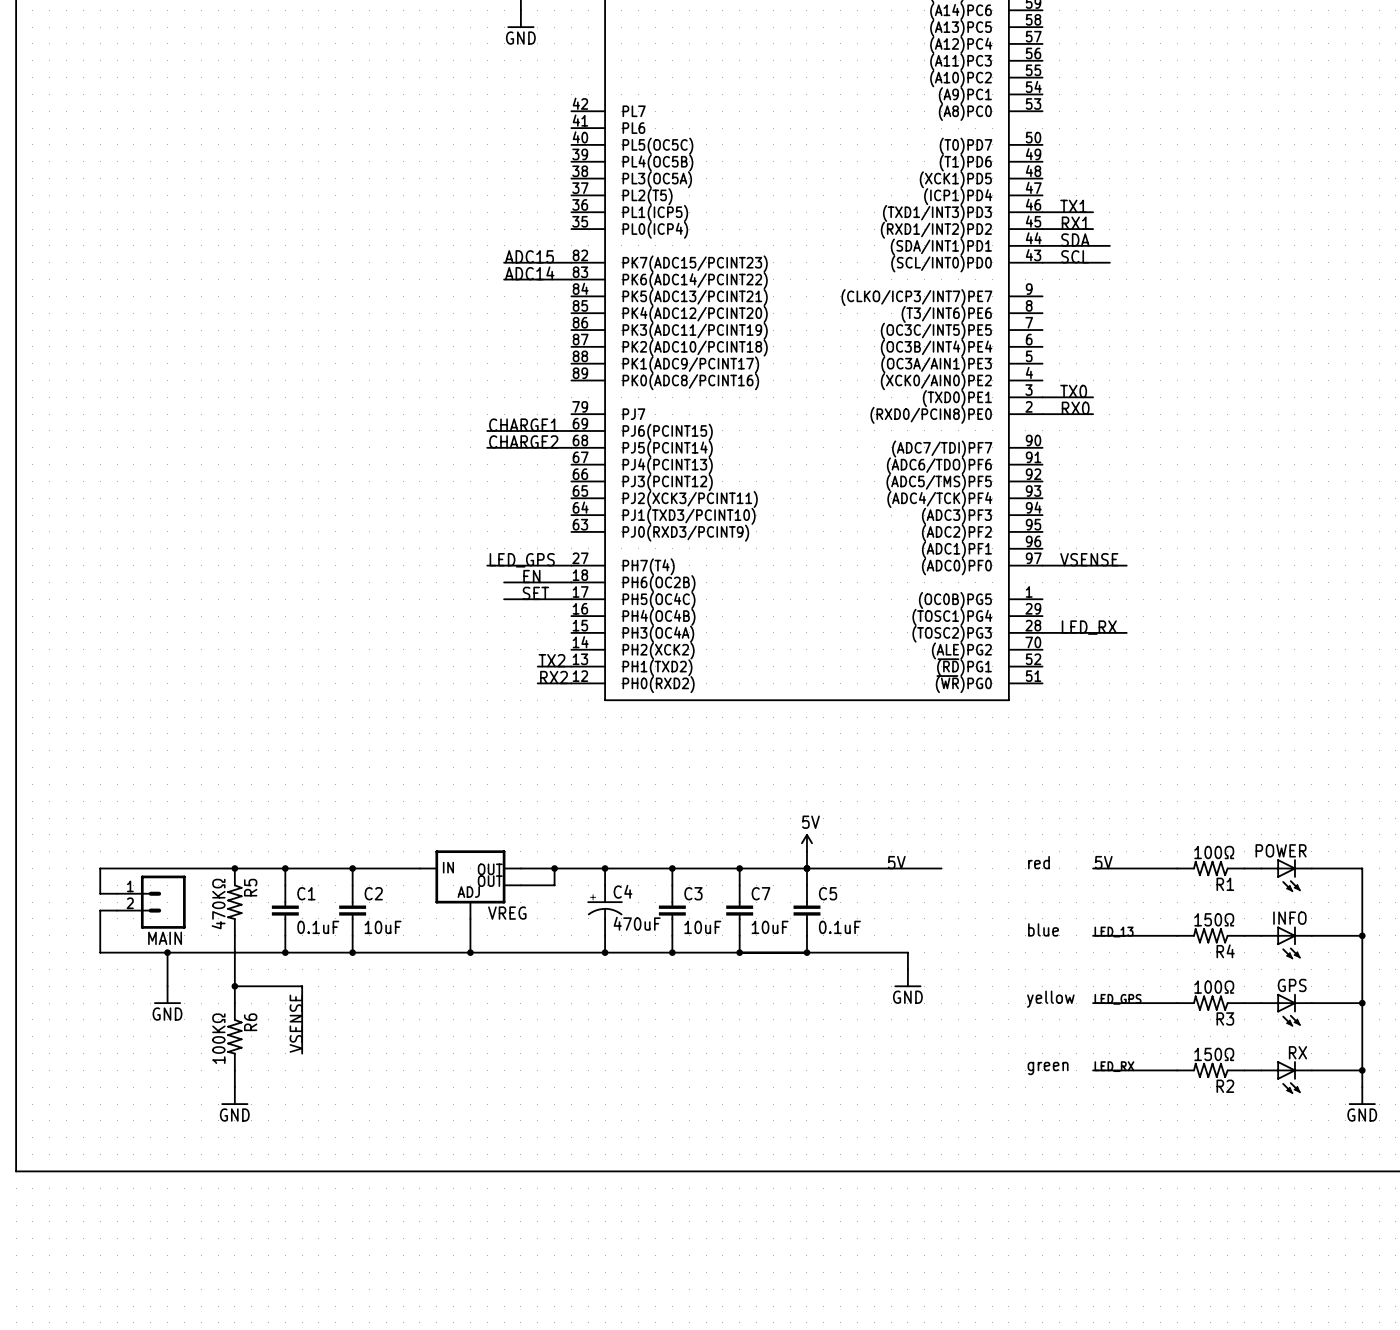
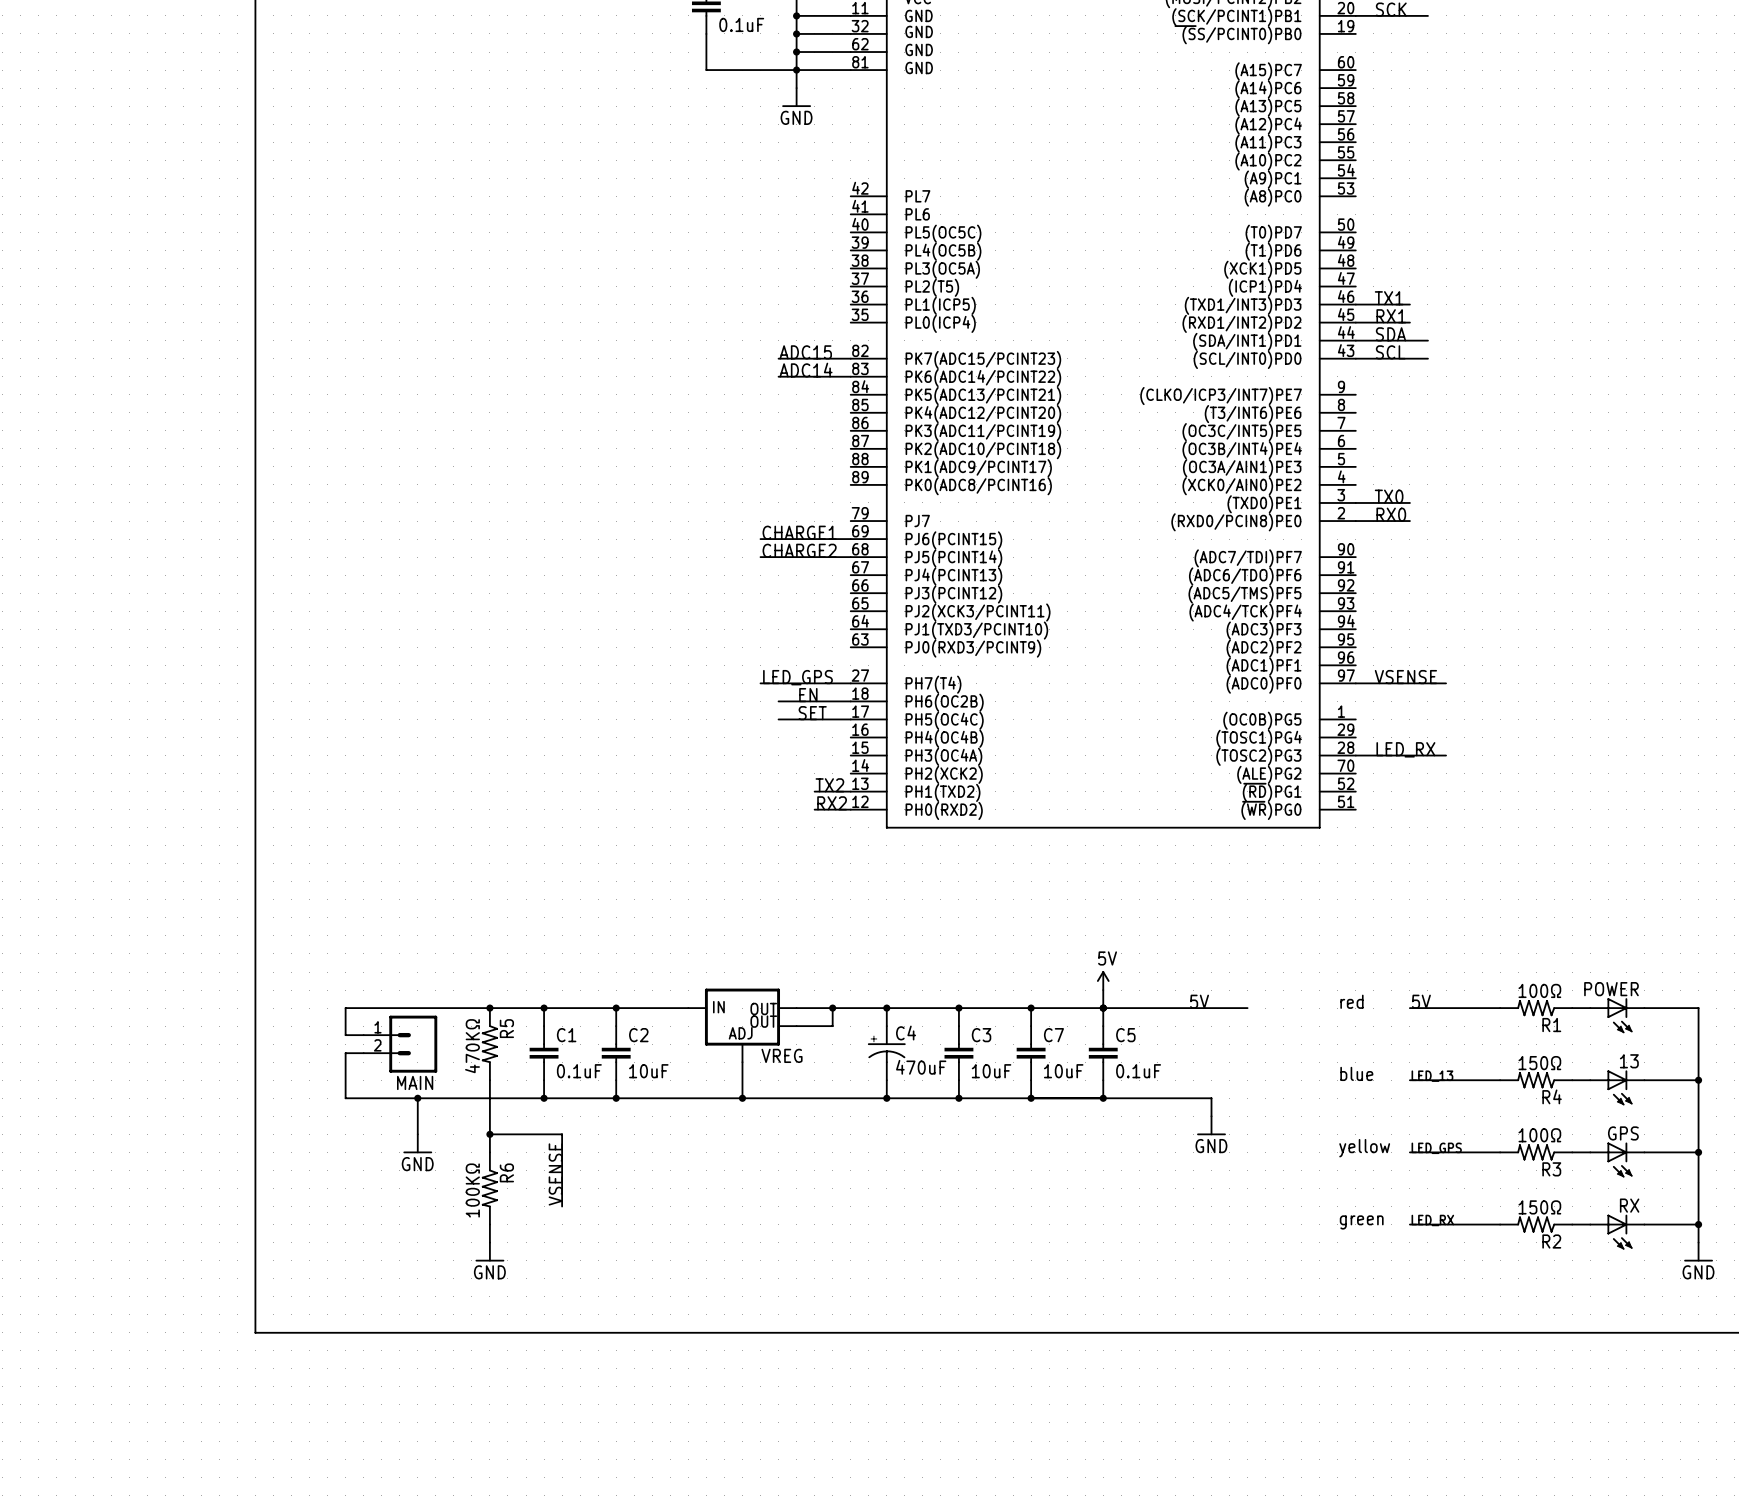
INFO name: INFO (1289, 918) -> 13 (1629, 1061)

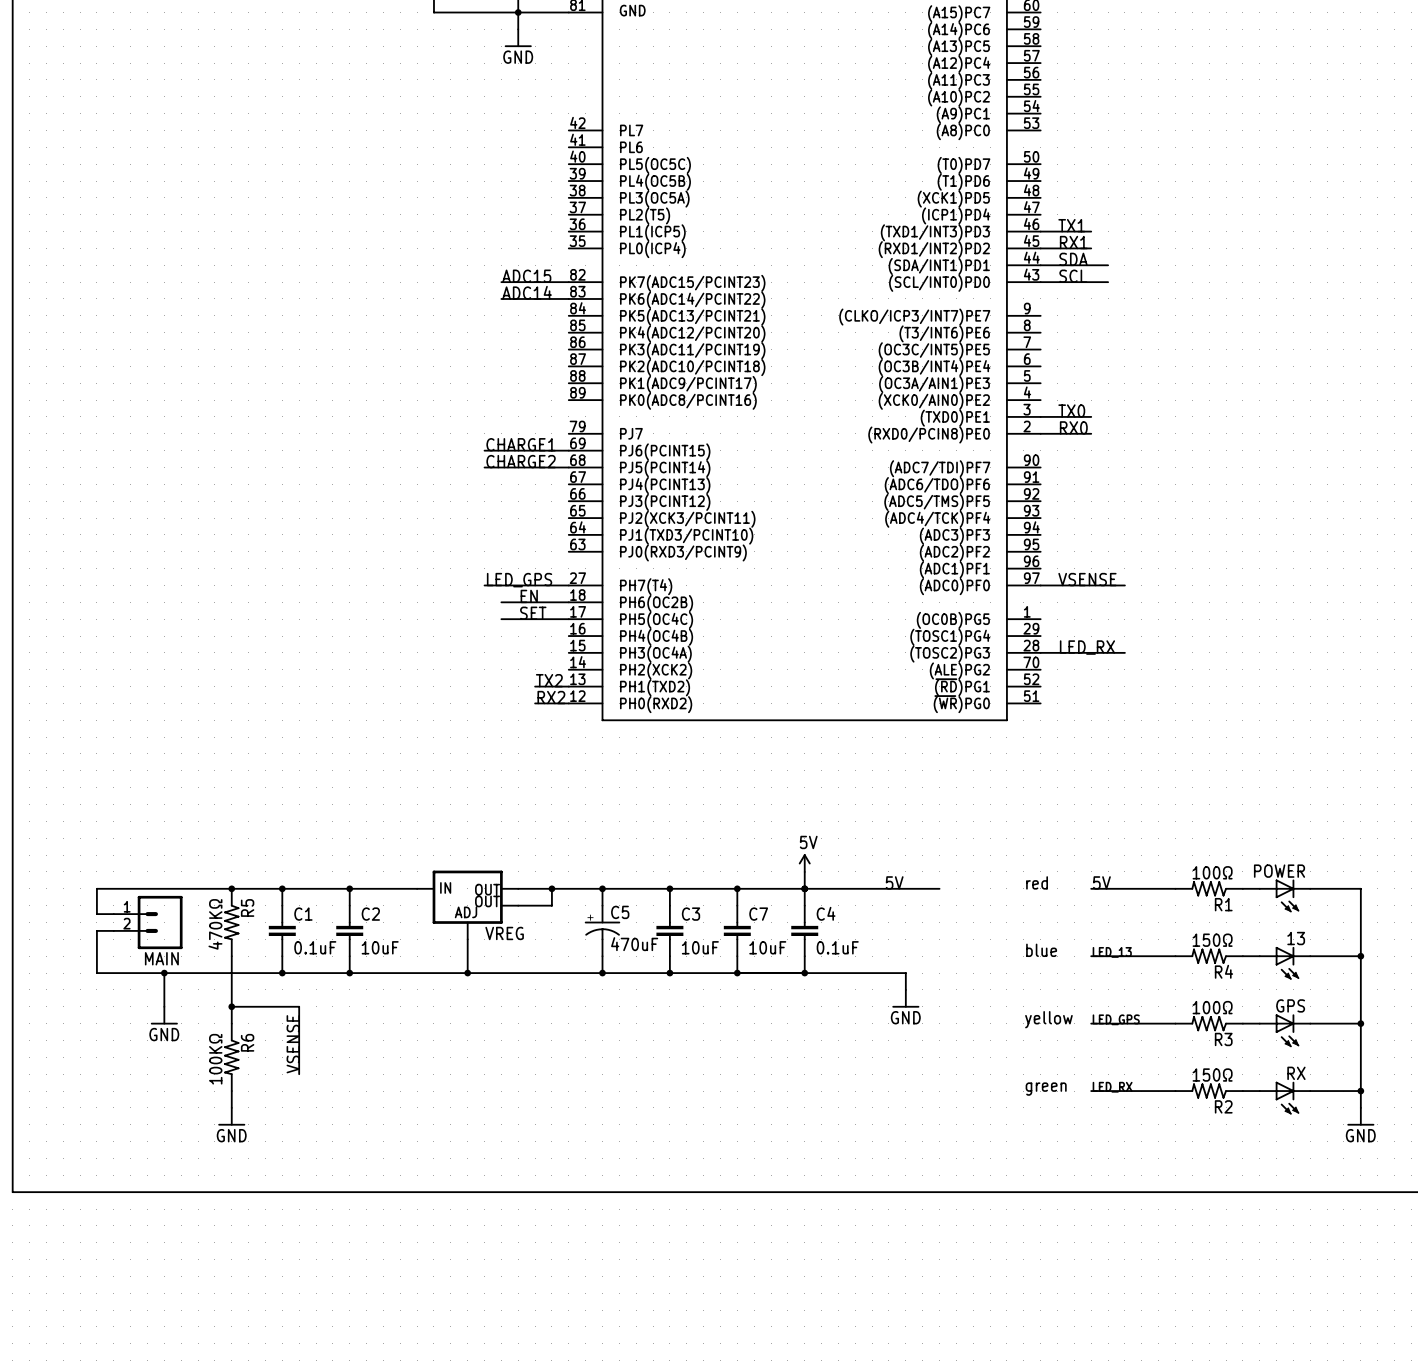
C4 name: C4 (906, 1033) -> C5 (620, 912)
C5 name: C5 (1125, 1035) -> C4 (826, 913)

